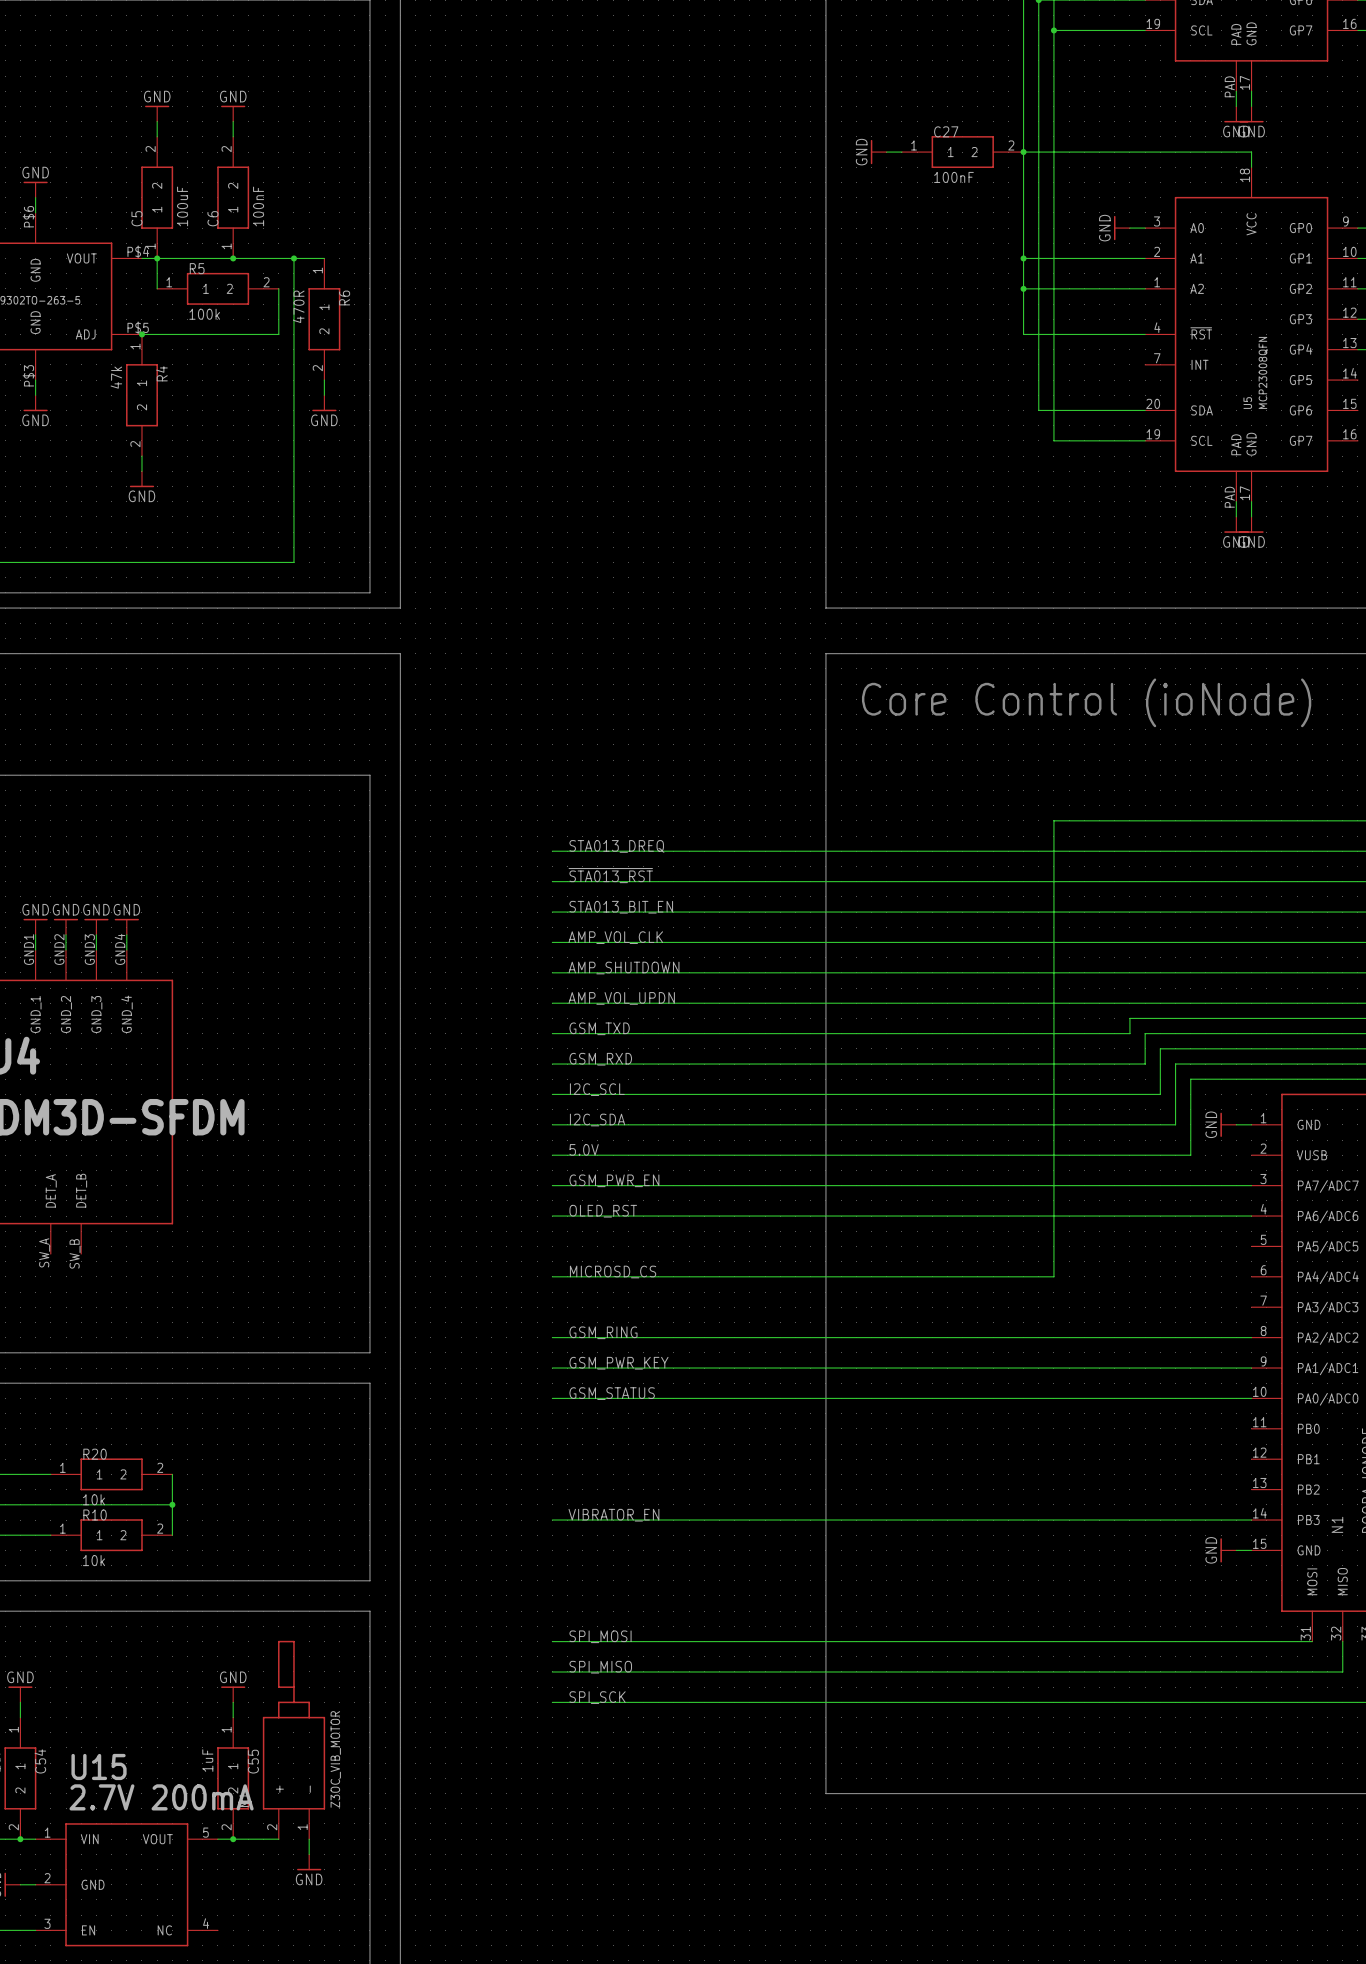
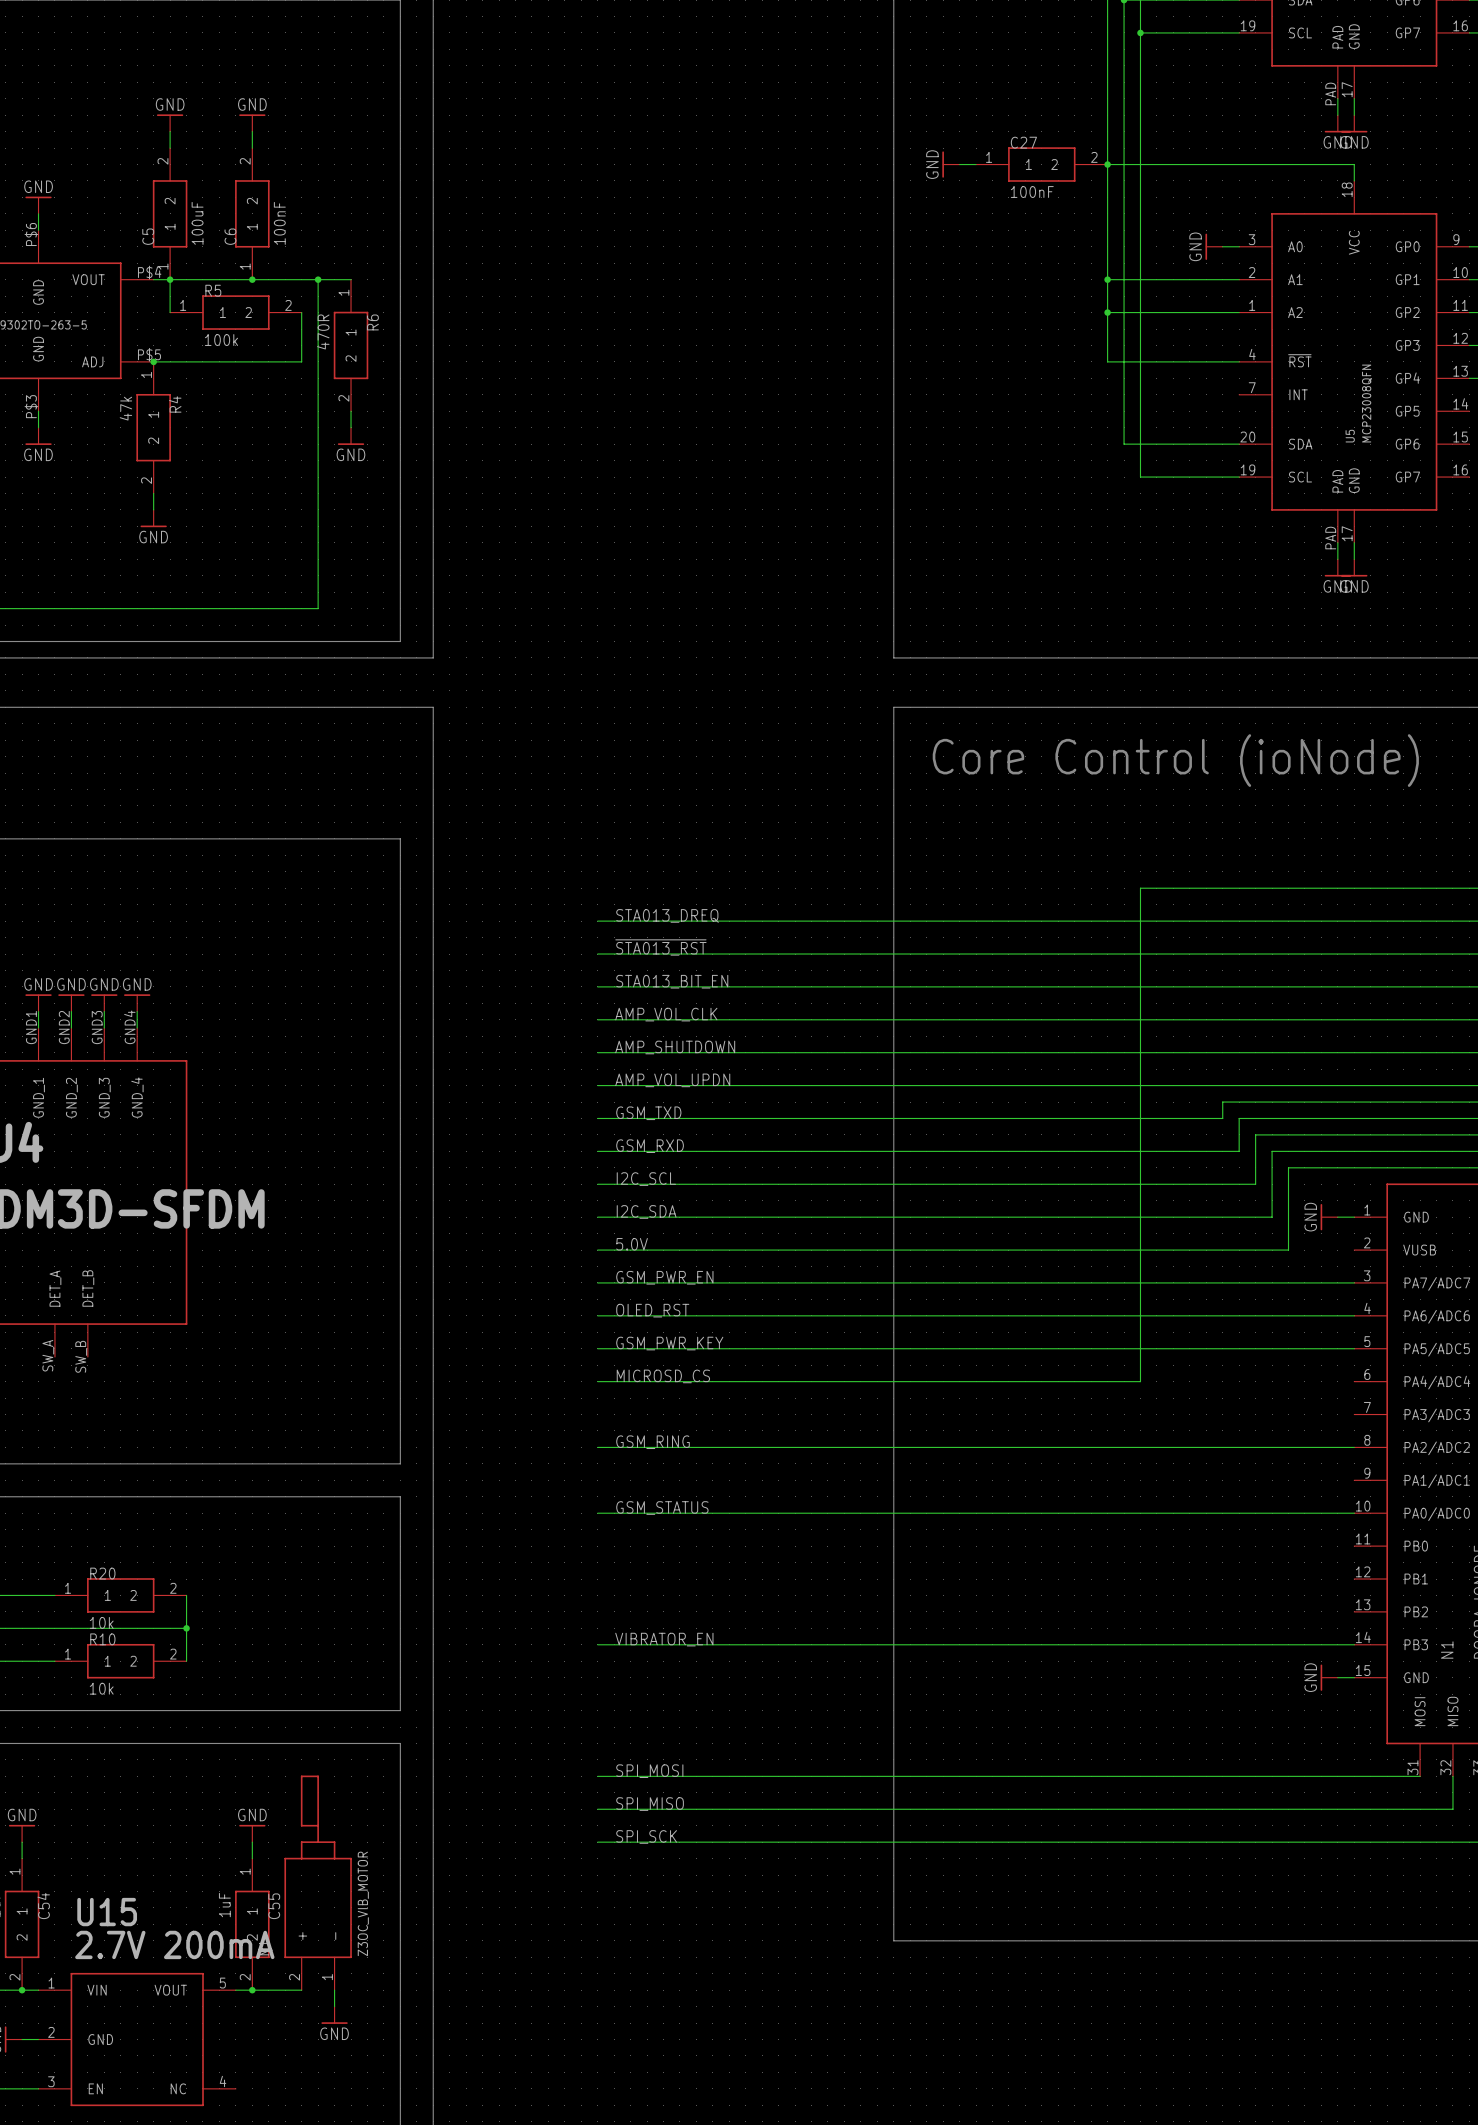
label position: GSM_PWR_KEY (618, 1363) -> GSM_PWR_KEY (669, 1343)
wire: (552, 1368) (1251, 1368) -> (597, 1348) (1354, 1348)

